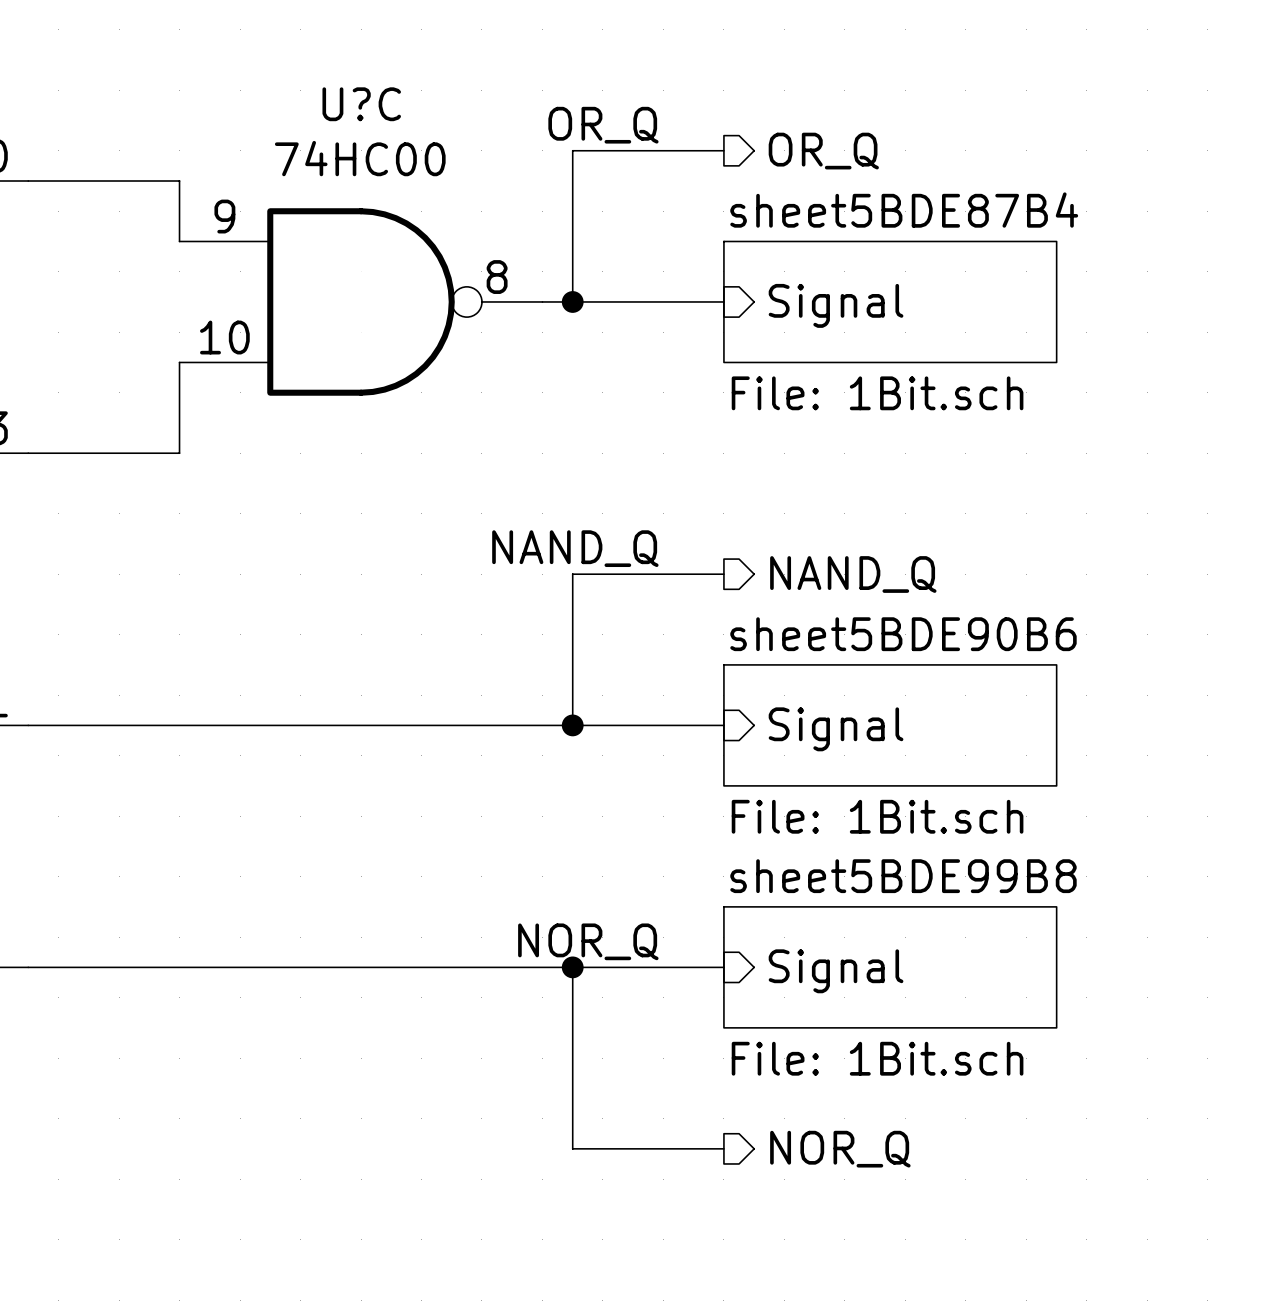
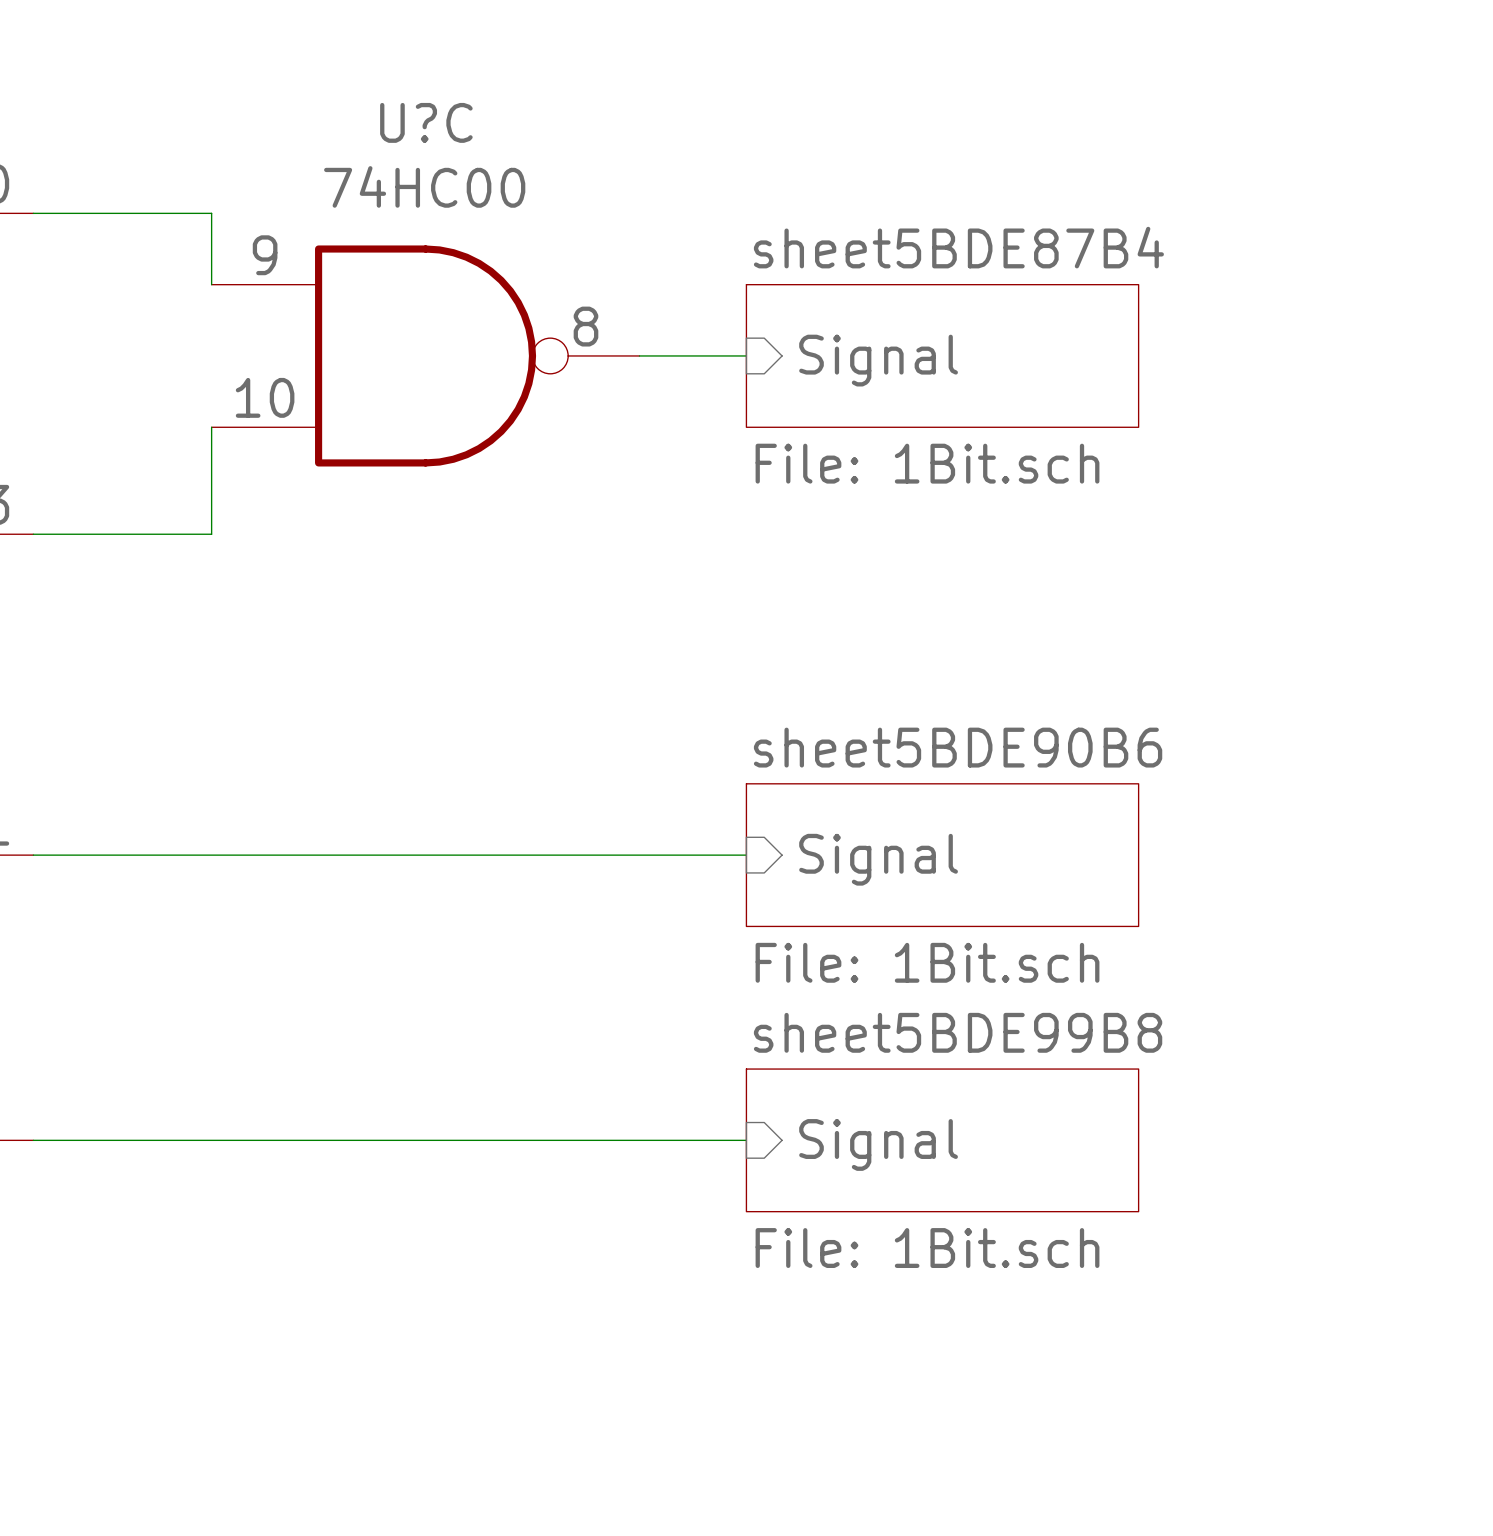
label: OR_Q (603, 125) -> none
wire: (723, 150) (572, 150) (572, 301) -> none
hierarchical label: OR_Q (823, 151) -> none
junction: (572, 301) -> none
wire: (633, 301) (723, 301) -> none
sheet sheet5BDE87B4 position: (890, 301) -> (942, 355)
sheet pin position: Signal (836, 305) -> Signal (878, 360)
label: NAND_Q (575, 548) -> none
wire: (723, 574) (572, 574) (572, 725) -> none
hierarchical label: NAND_Q (853, 574) -> none
junction: (572, 725) -> none
wire: (633, 725) (723, 725) -> none
sheet sheet5BDE90B6 position: (890, 725) -> (942, 855)
sheet pin position: Signal (836, 729) -> Signal (878, 859)
label: NOR_Q (588, 941) -> none
wire: (572, 967) (572, 1148) (723, 1148) -> none
junction: (572, 967) -> none
wire: (633, 967) (723, 967) -> none
sheet sheet5BDE99B8 position: (890, 967) -> (942, 1140)
sheet pin position: Signal (836, 971) -> Signal (878, 1144)
hierarchical label: NOR_Q (840, 1149) -> none

